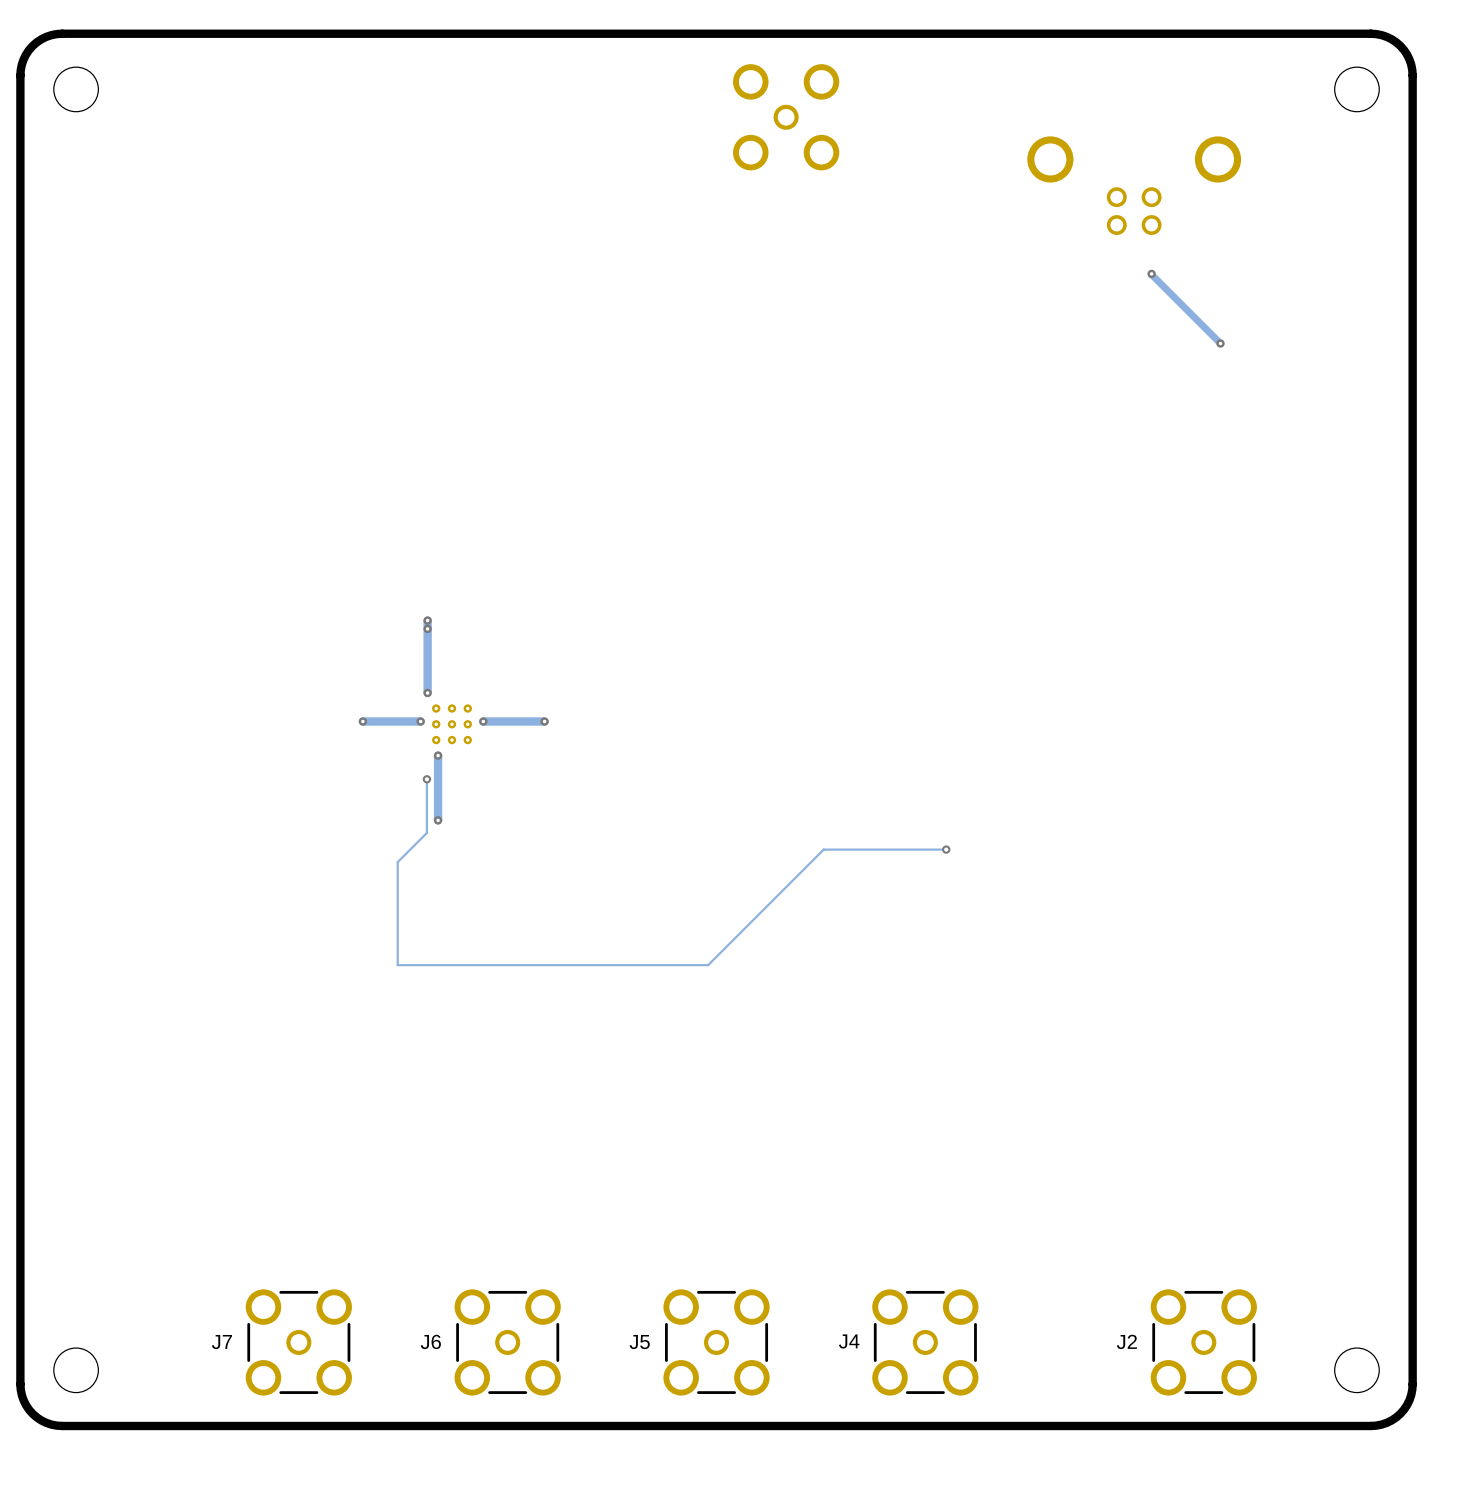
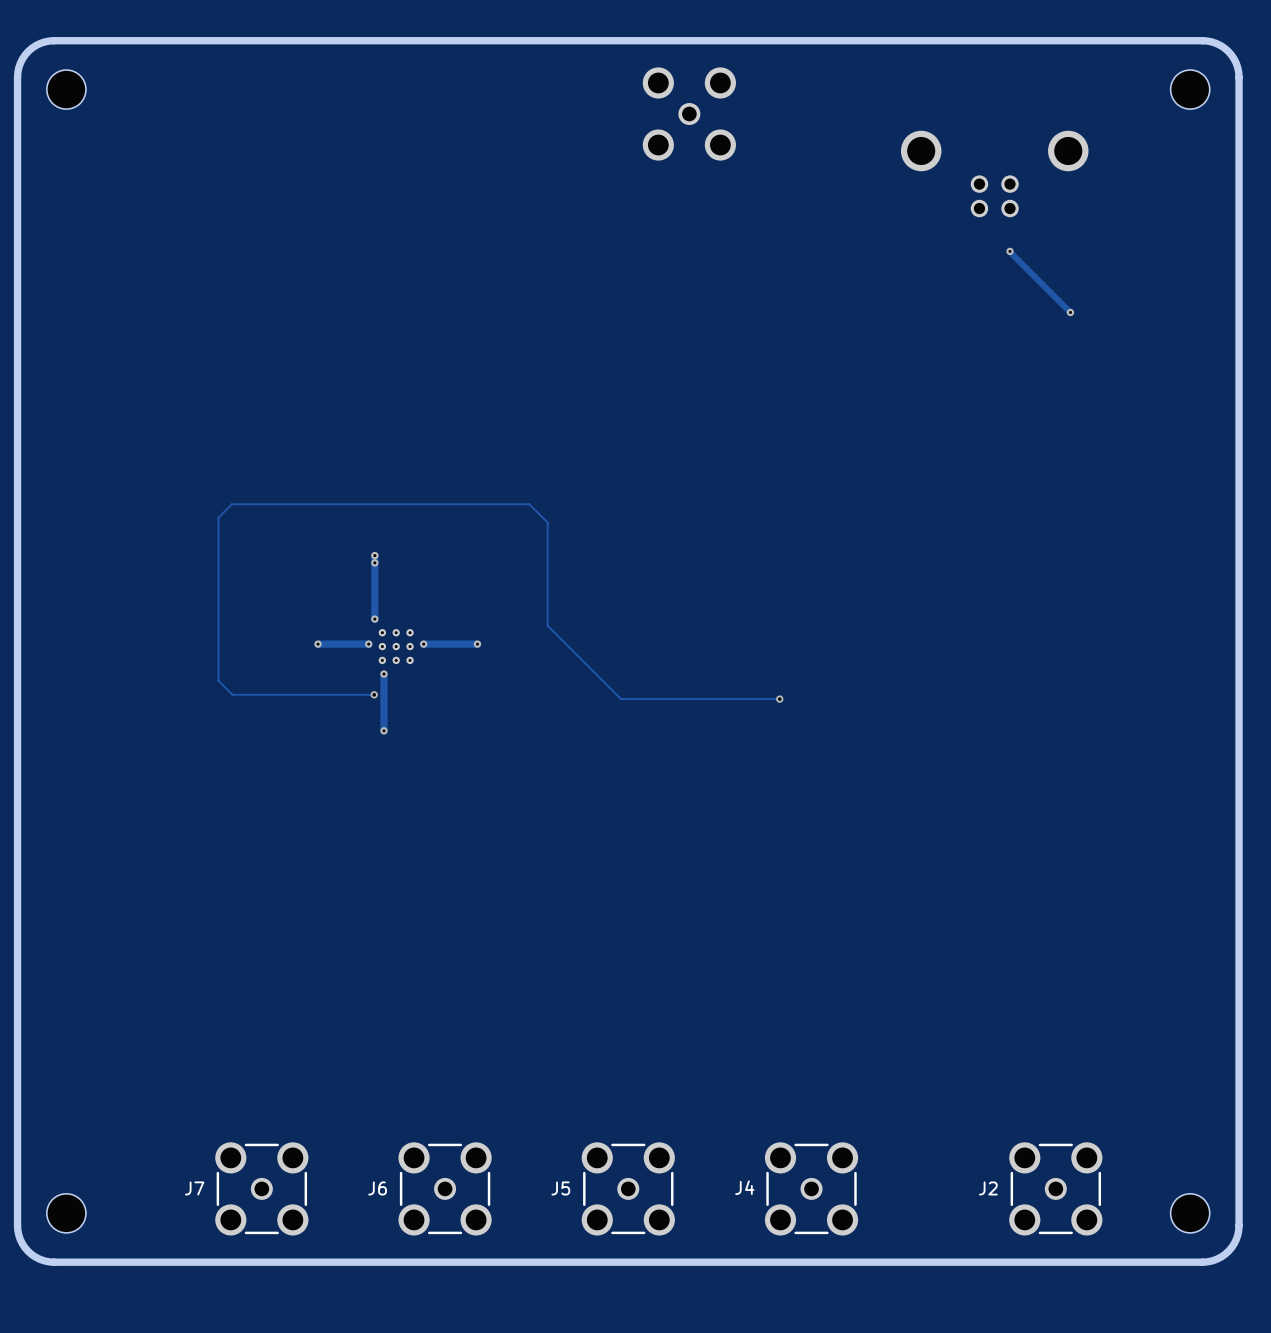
track: (426, 779) (426, 832) (397, 862) (397, 965) (708, 965) (823, 849) (946, 849) -> (374, 694) (232, 694) (218, 680) (218, 517) (231, 504) (529, 504) (547, 522) (547, 625) (620, 699) (779, 699)
via: none -> (779, 699)
via: (946, 849) -> none

